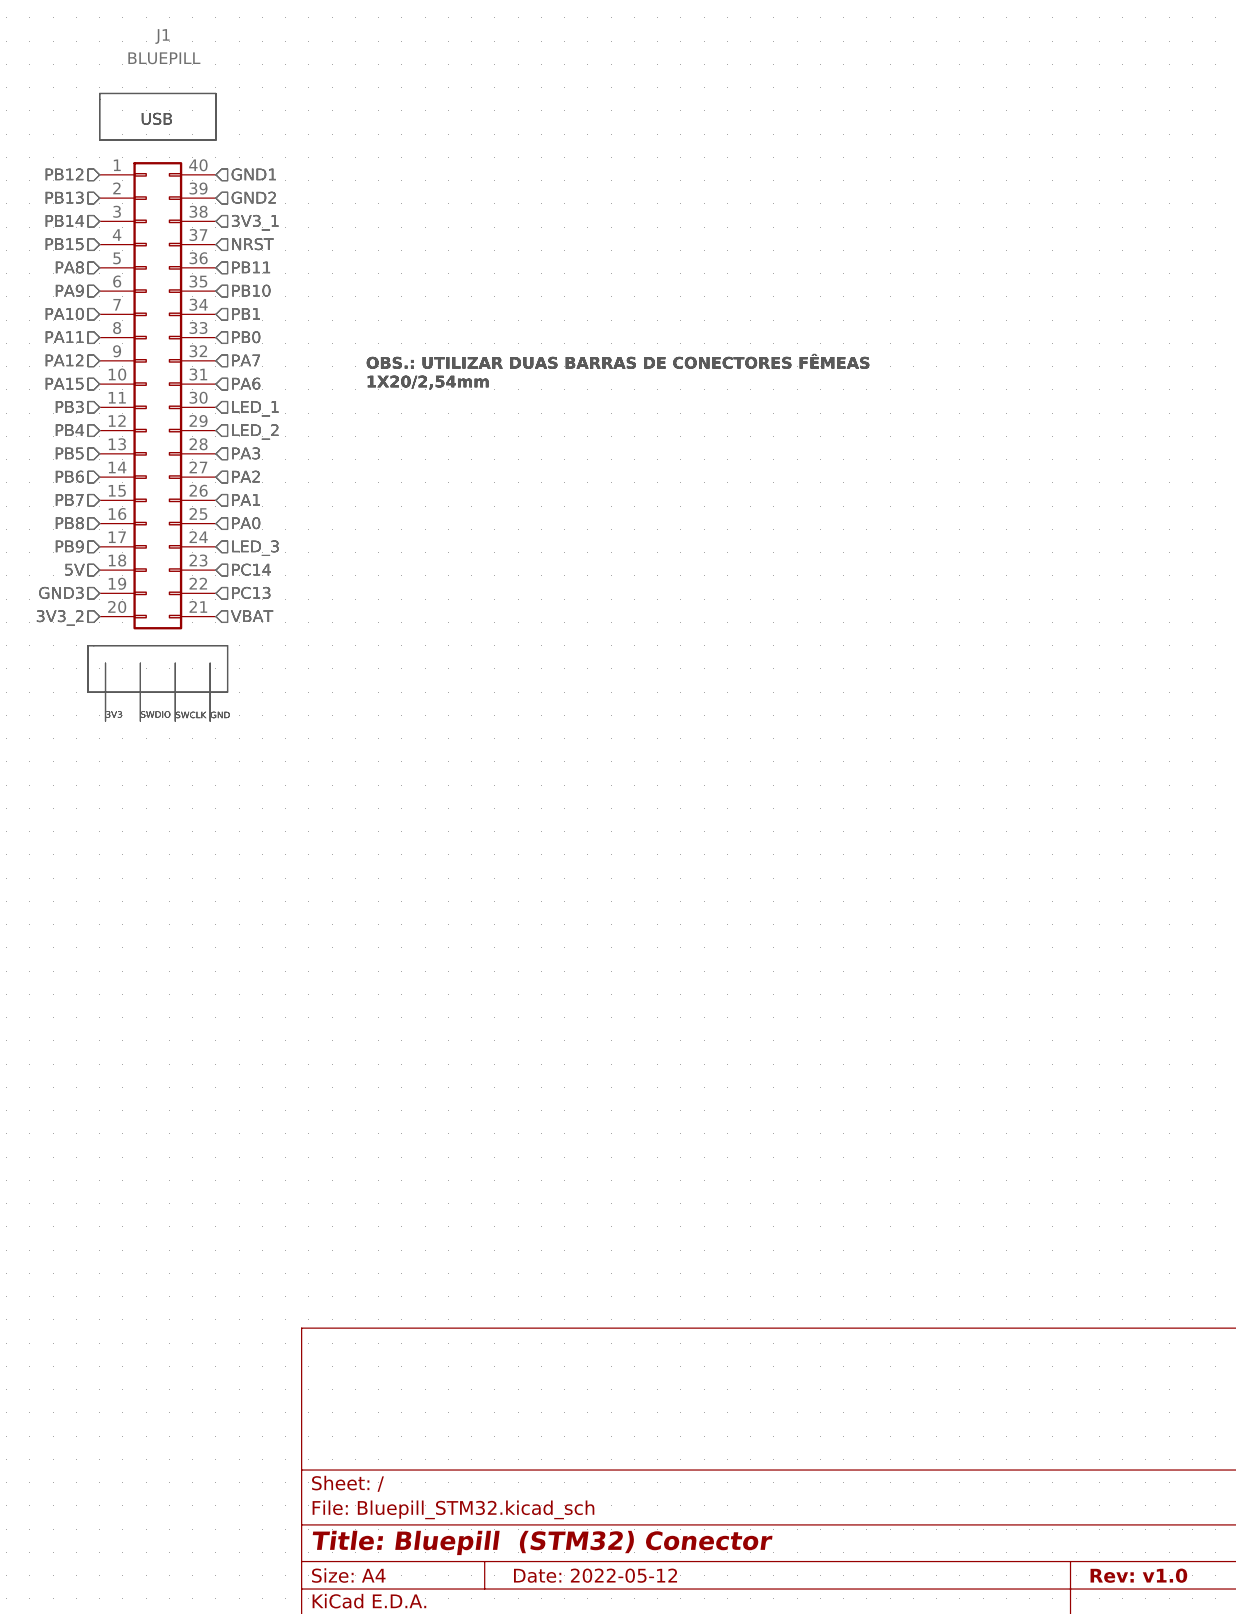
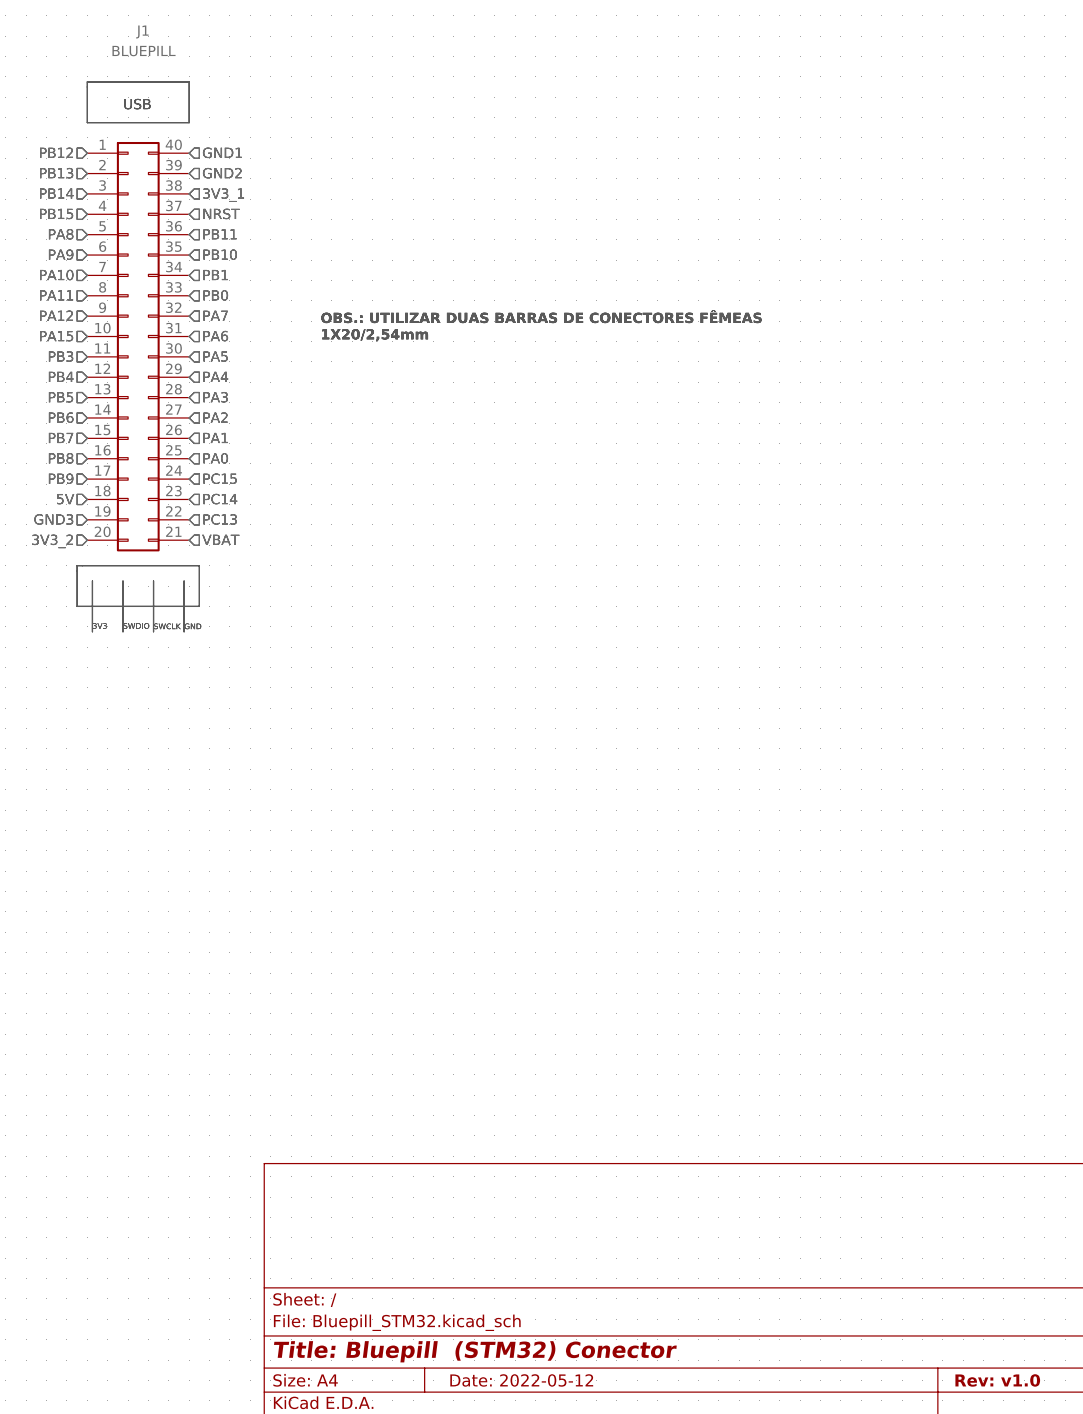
hierarchical label: LED_1 (255, 408) -> PA5 (215, 356)
hierarchical label: LED_2 (255, 431) -> PA4 (215, 376)
hierarchical label: LED_3 (255, 548) -> PC15 (220, 478)

